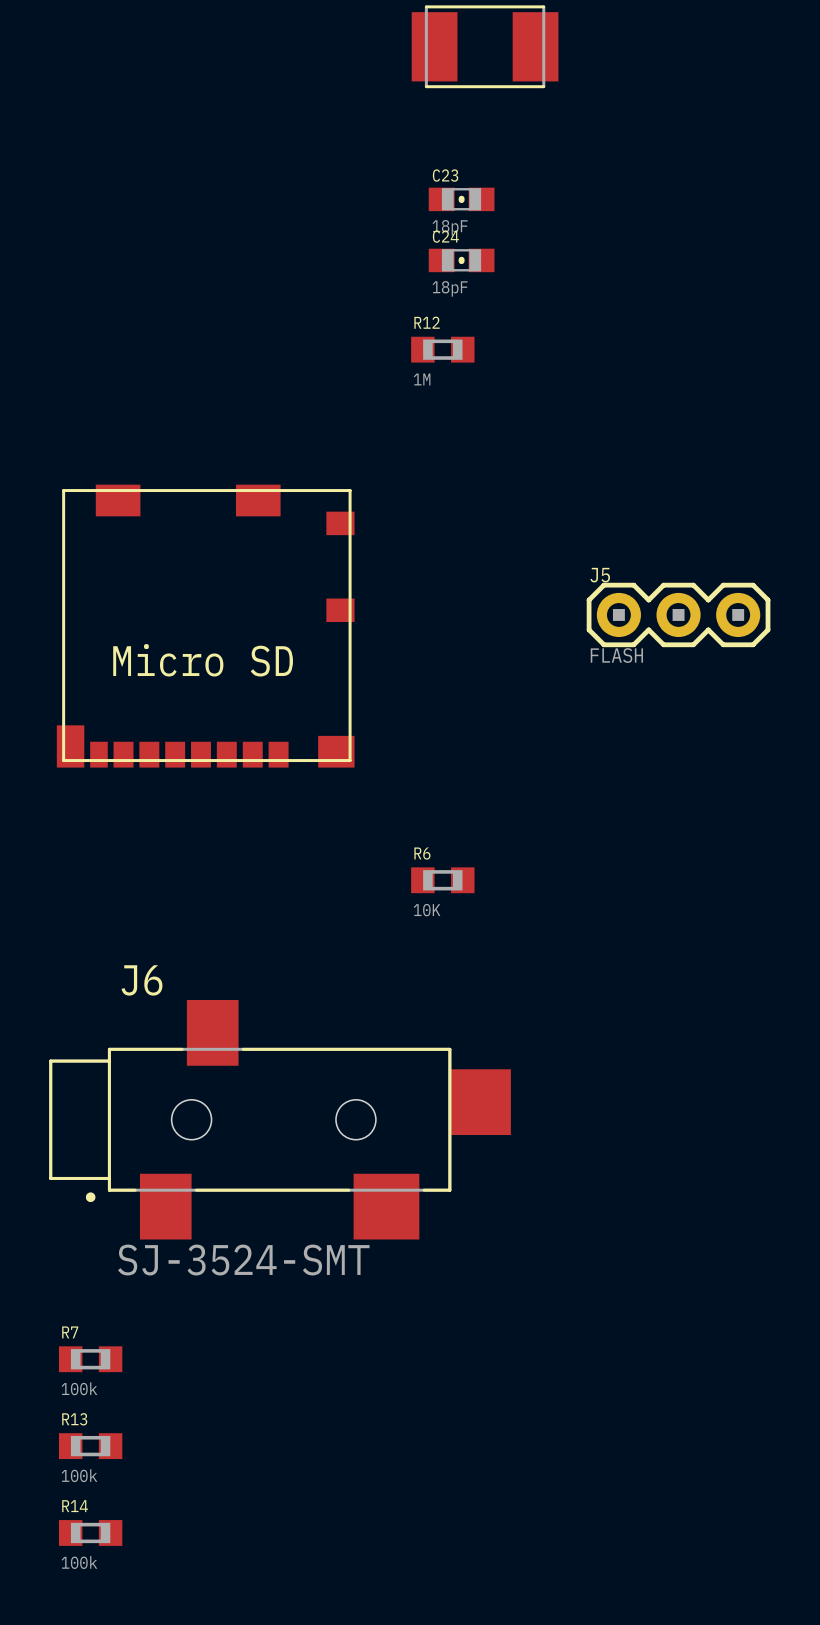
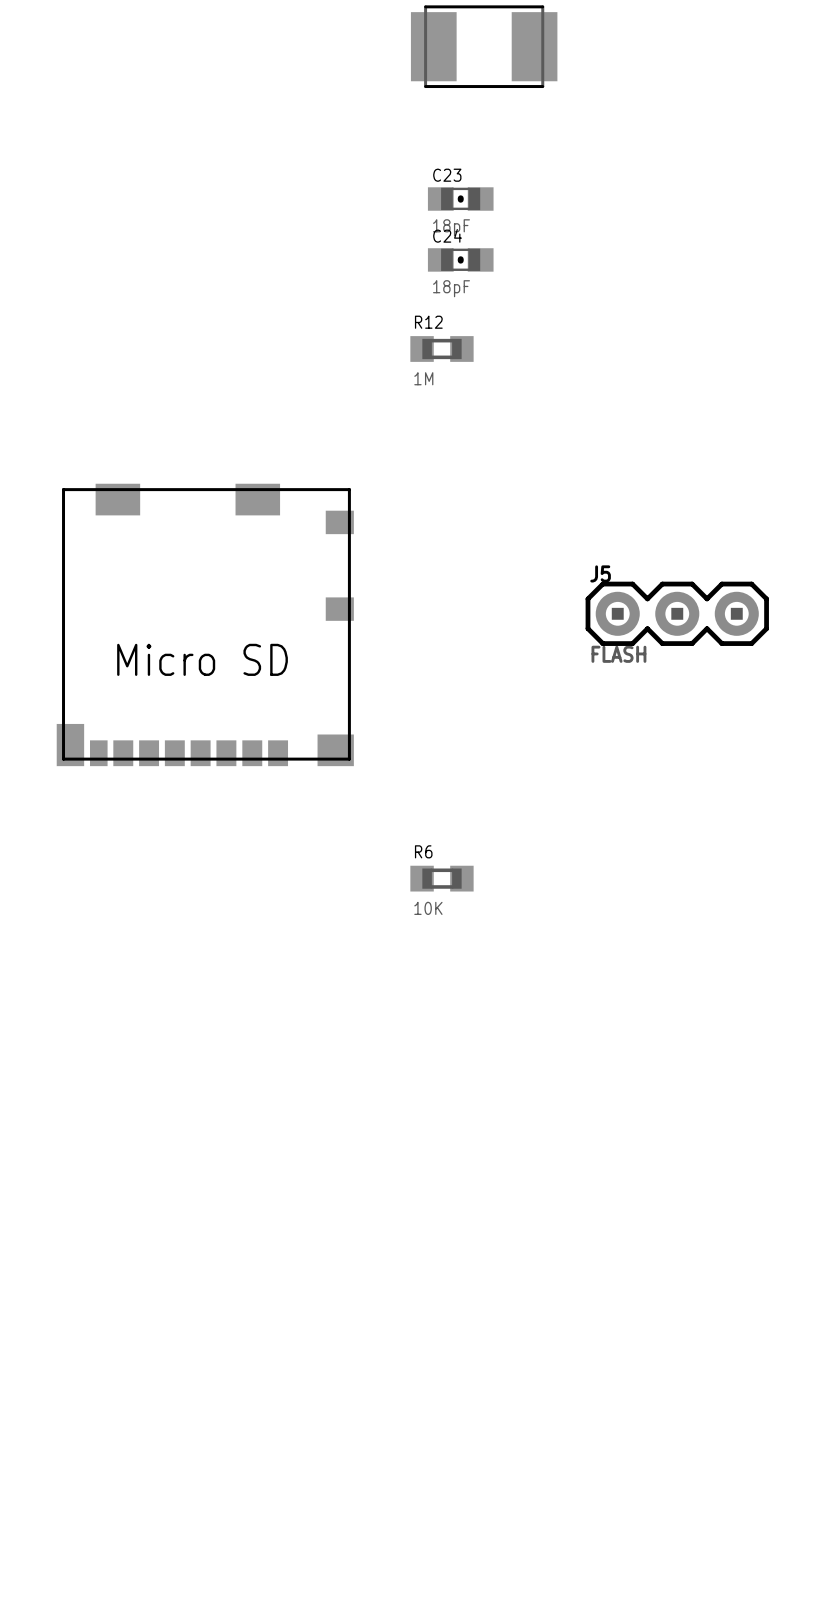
J6: SJ-3524-SMT (280, 1119) -> none
R7: 100k (90, 1359) -> none
R13: 100k (90, 1446) -> none
R14: 100k (90, 1532) -> none

